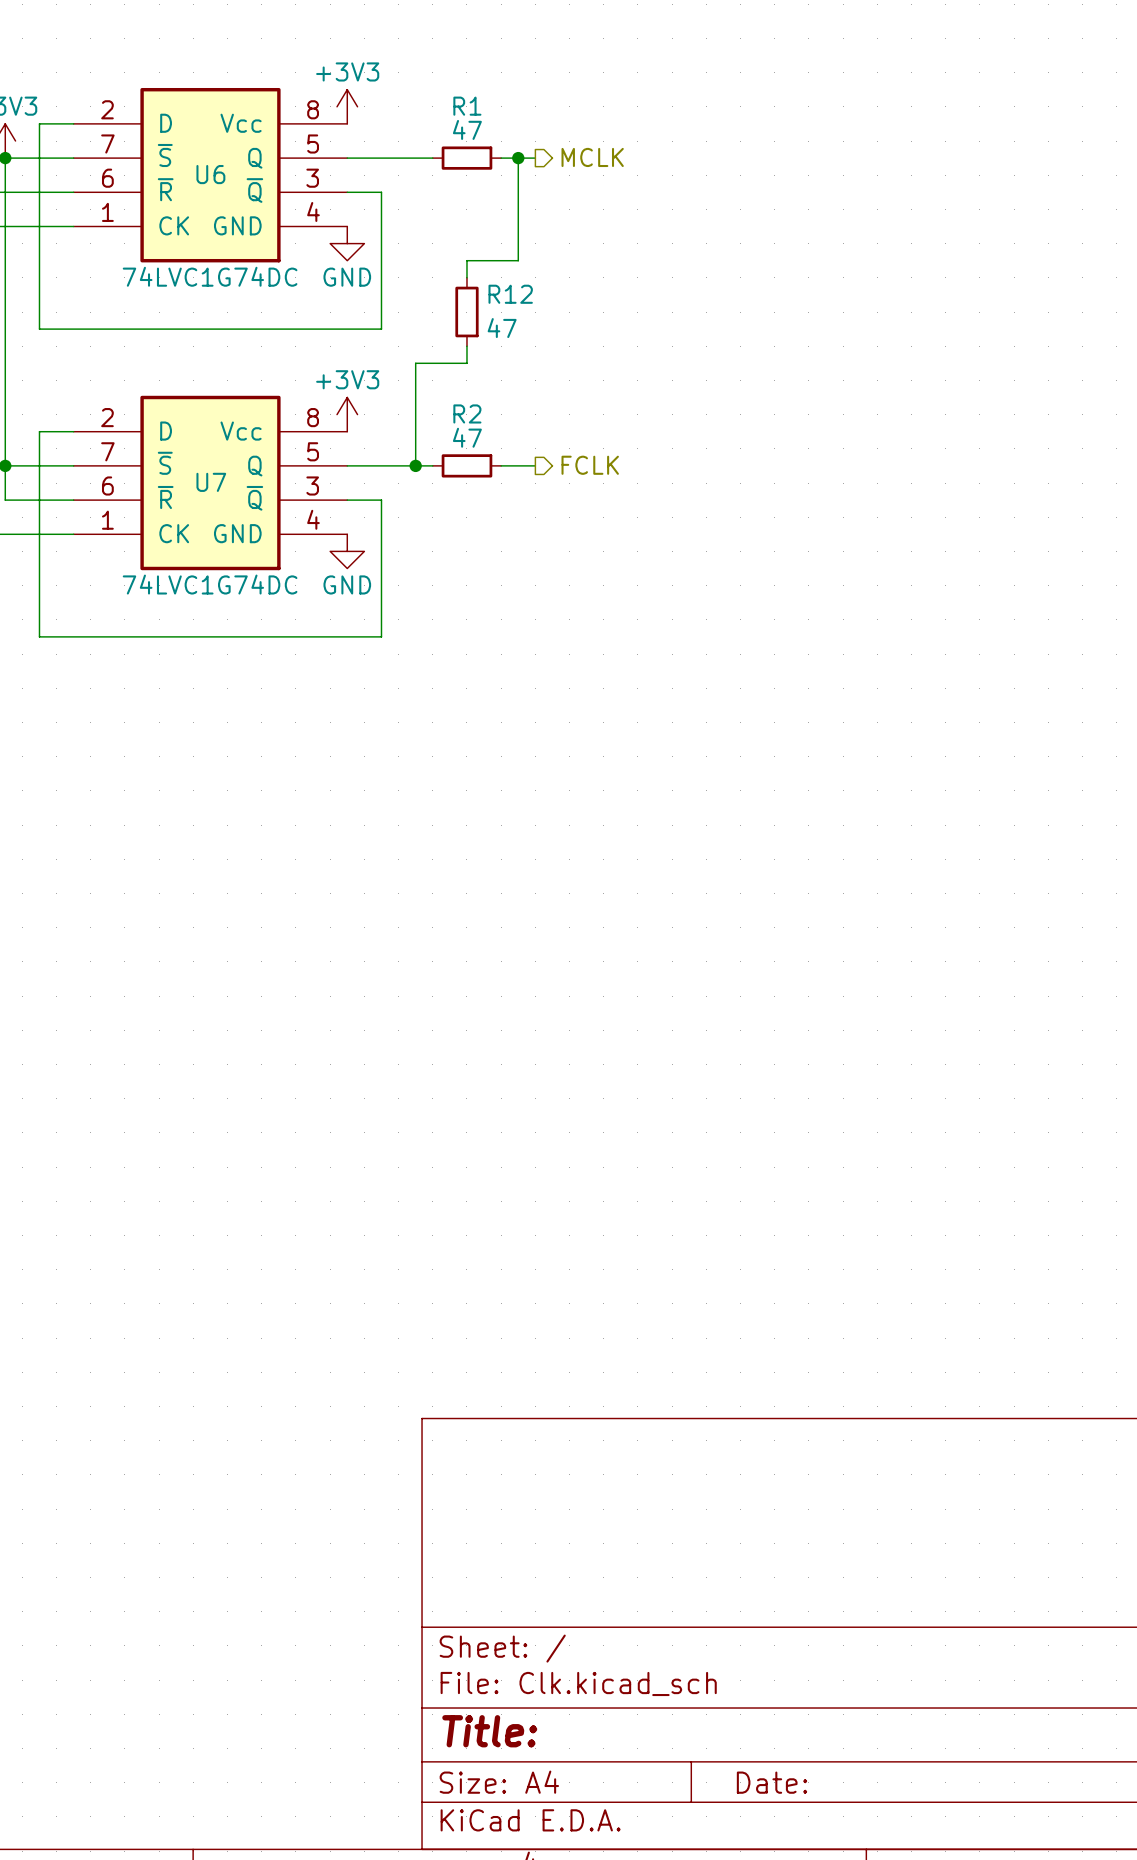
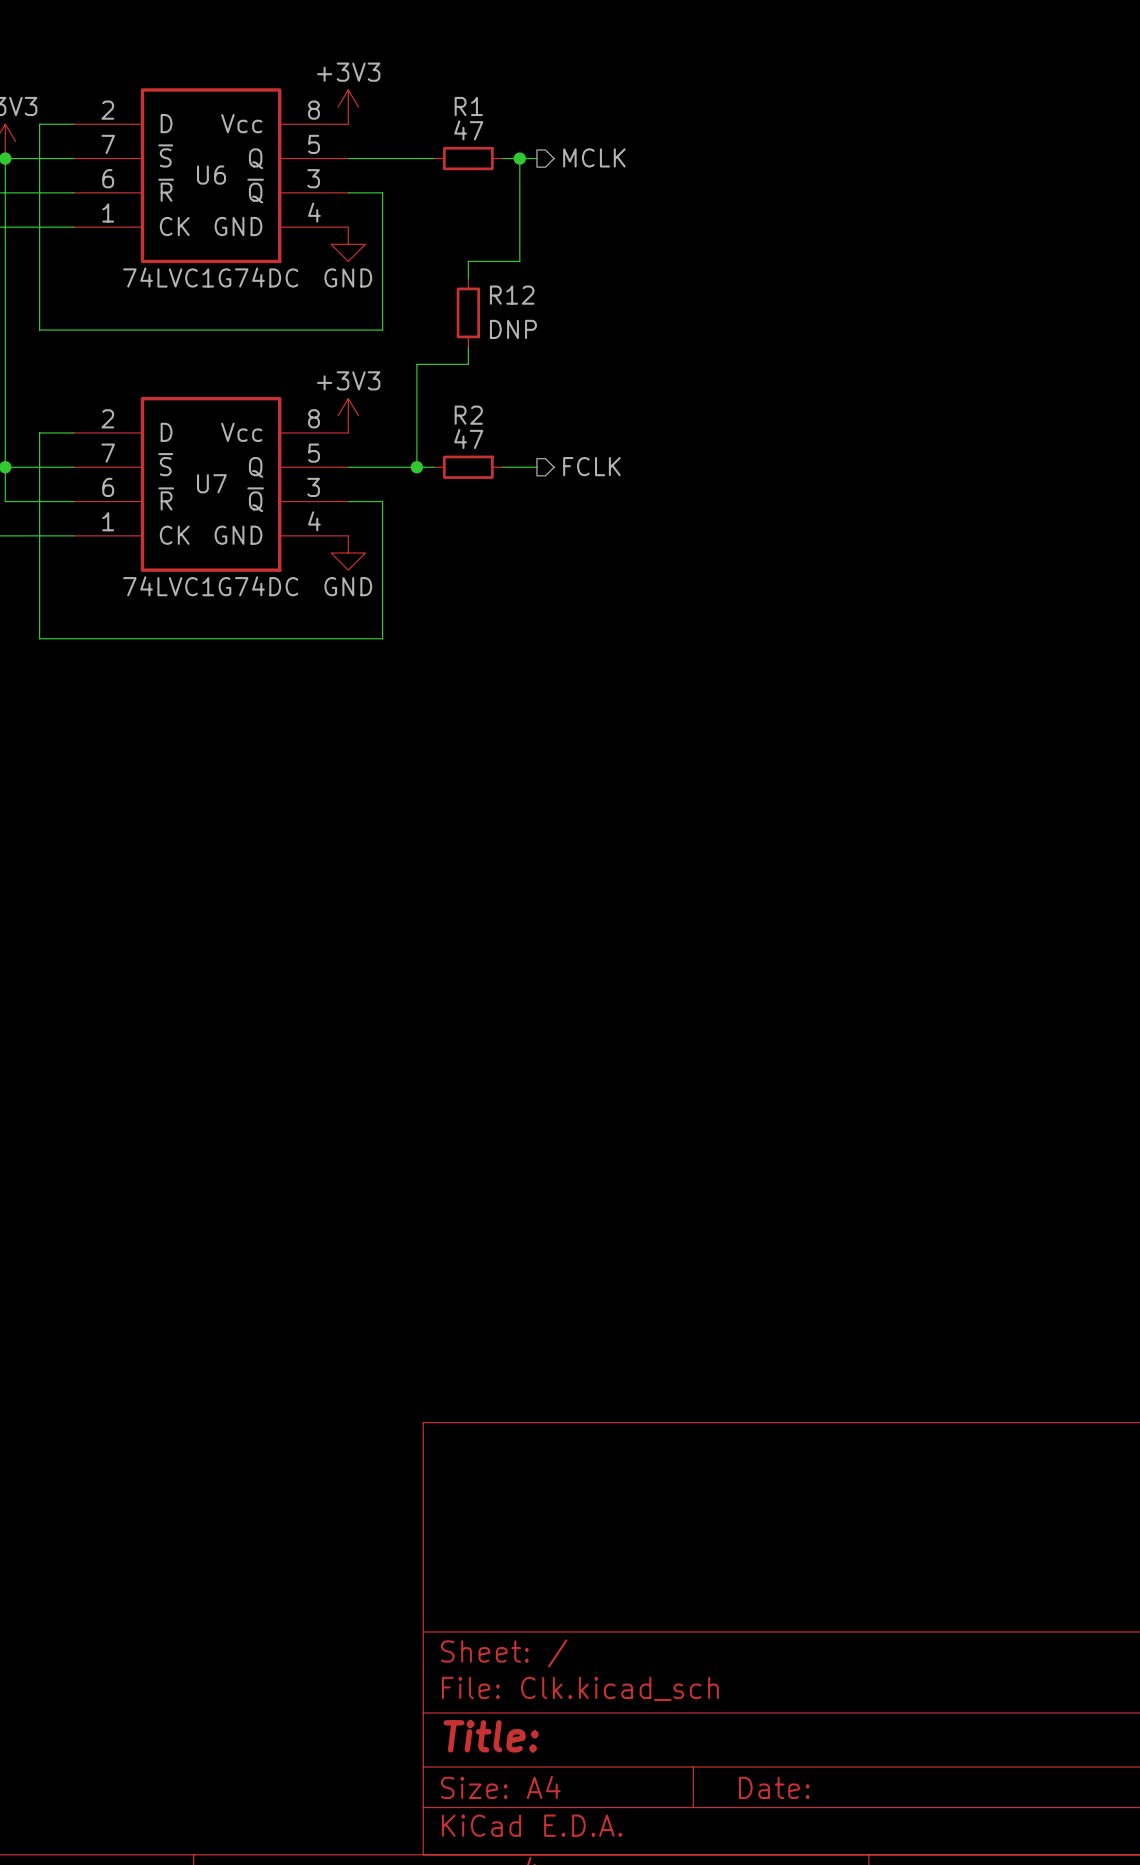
R12 value: 47 (502, 328) -> DNP (513, 329)

